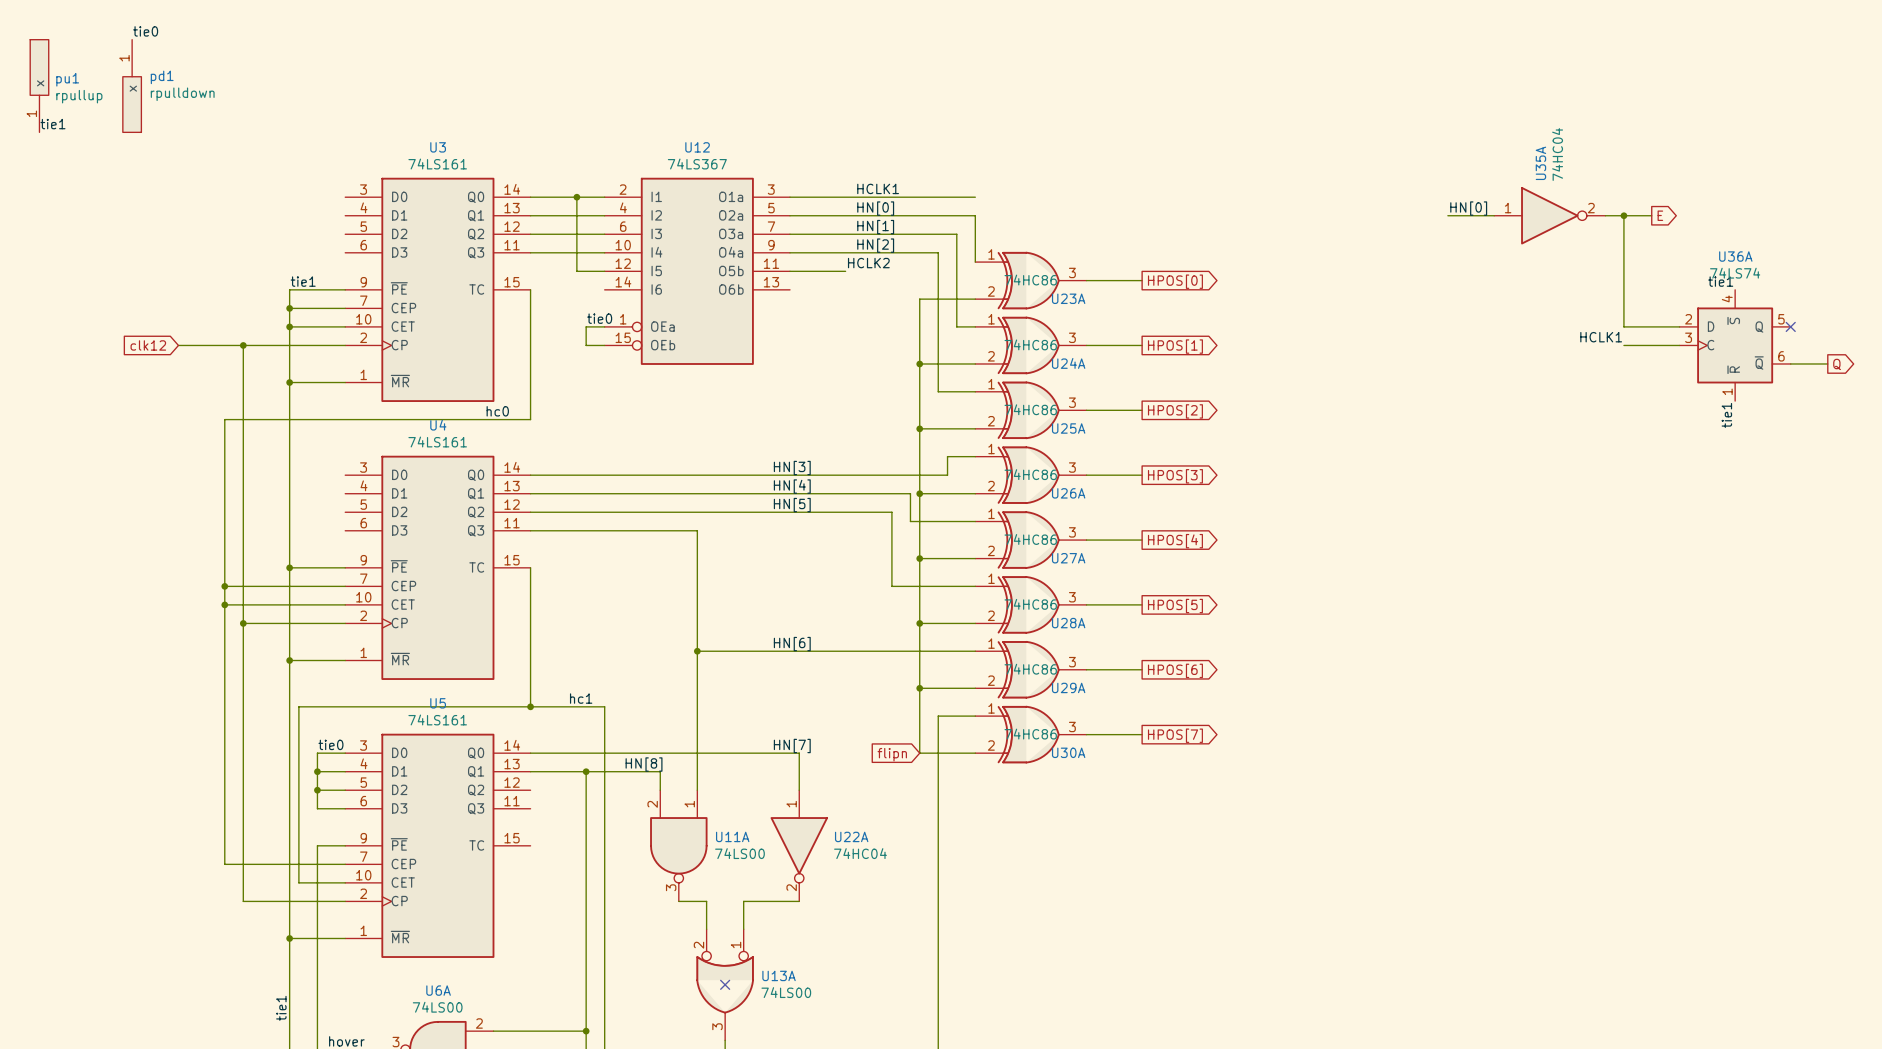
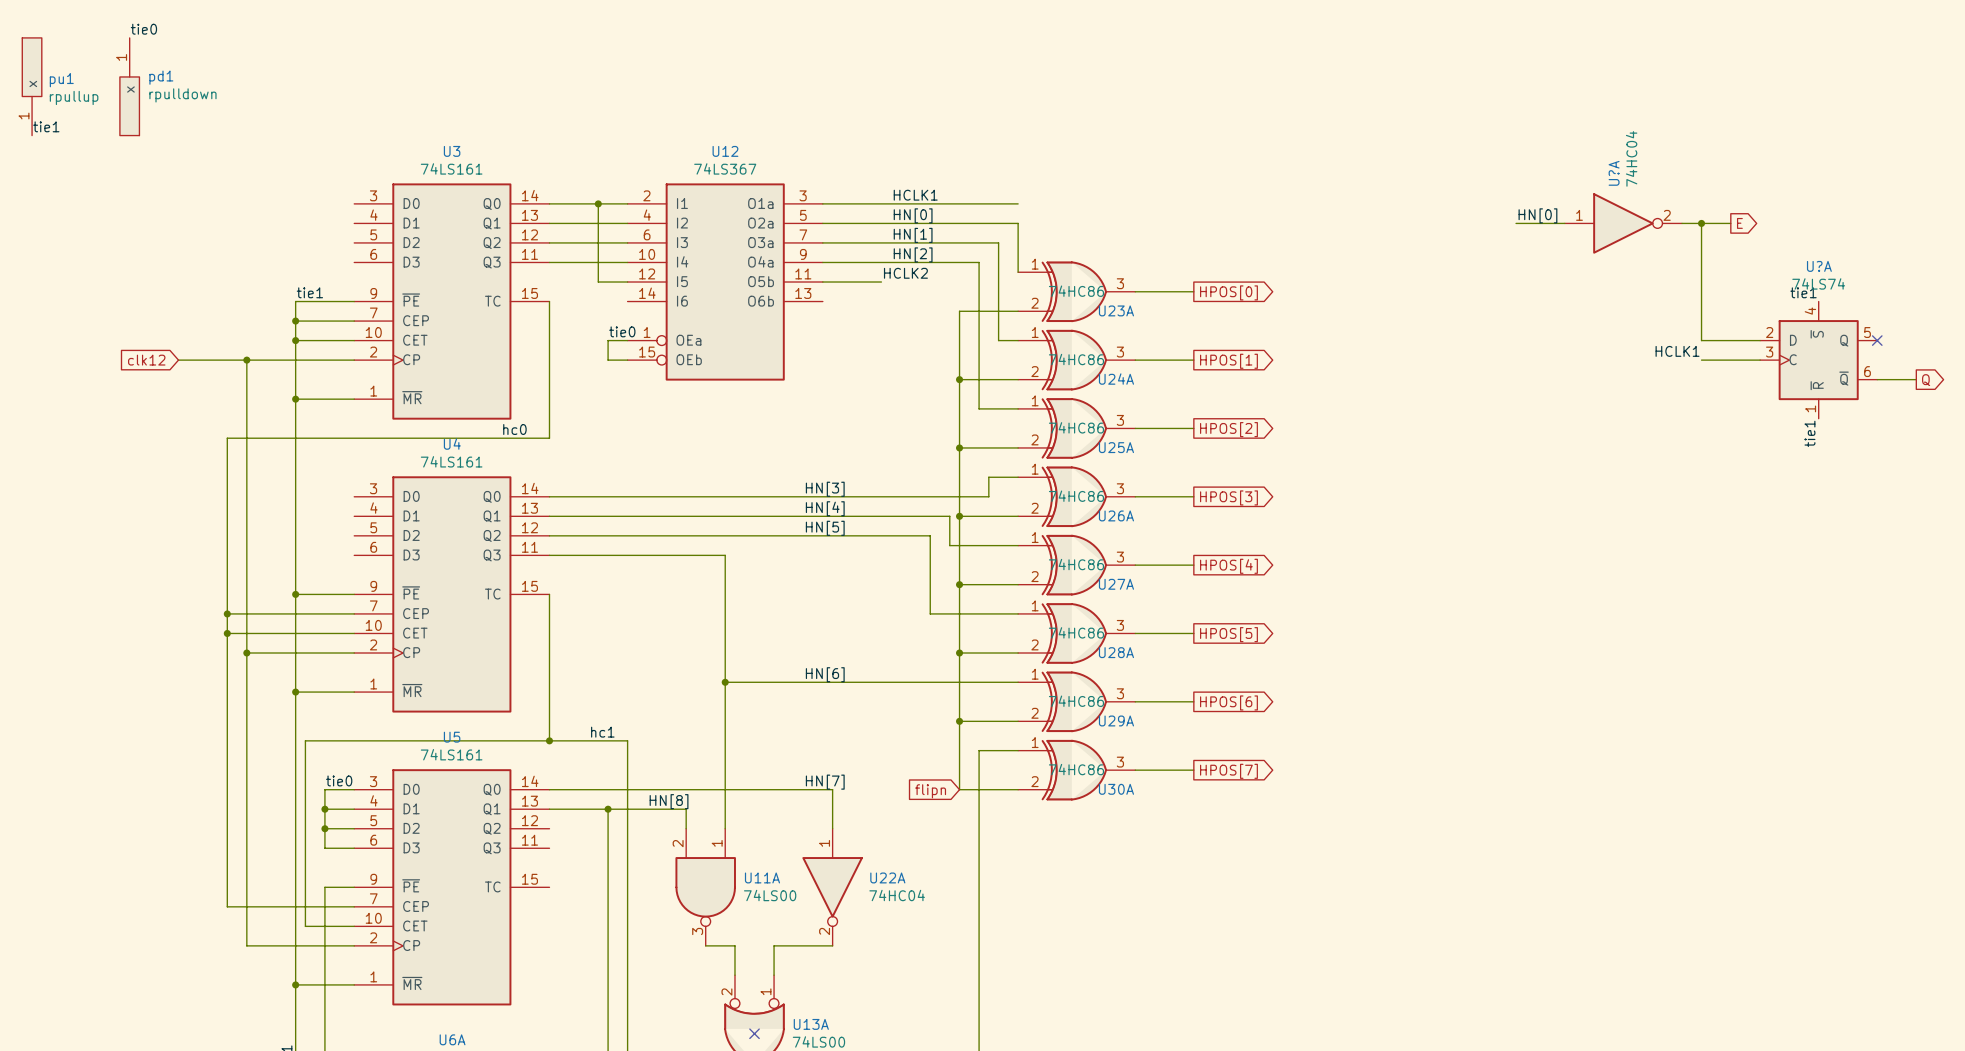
U35A name: U35A (1540, 163) -> U?A (1614, 173)
U36A name: U36A (1735, 256) -> U?A (1819, 266)

